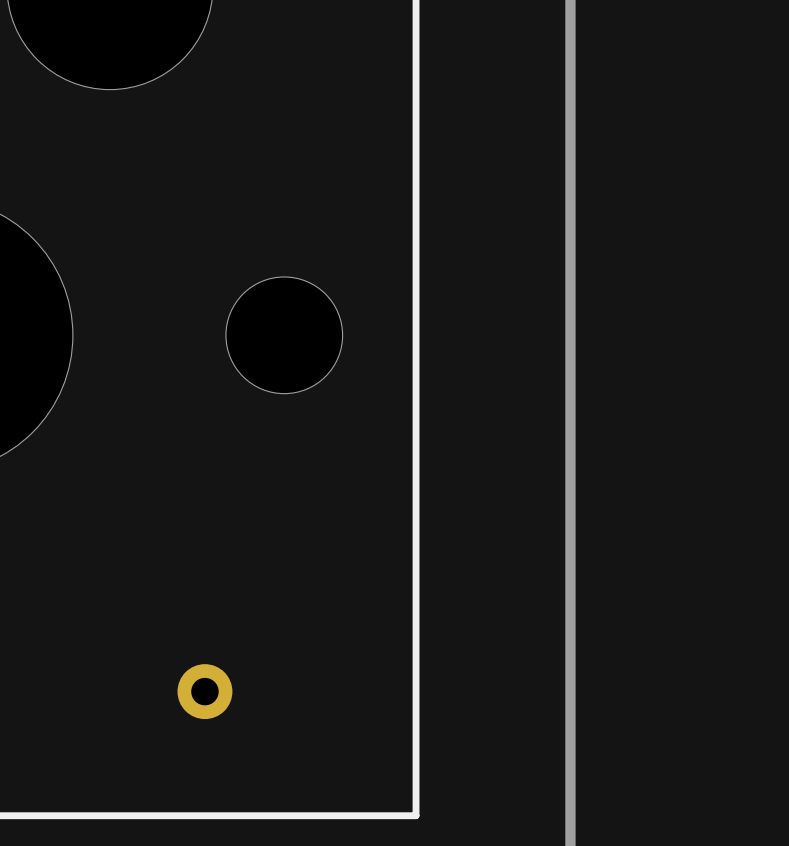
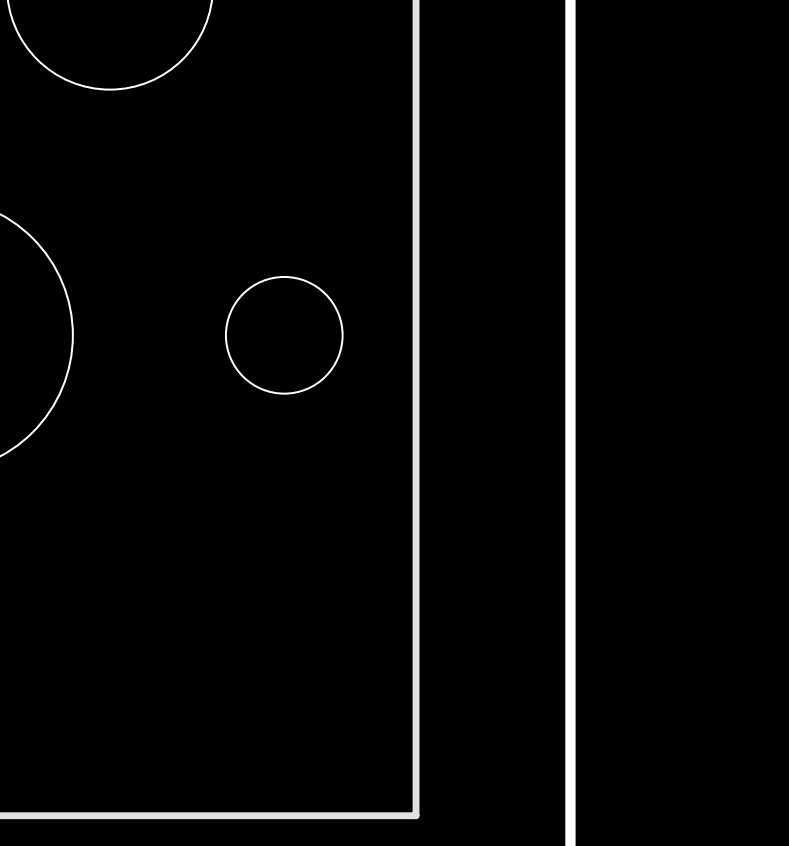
part: (204, 691) -> none

